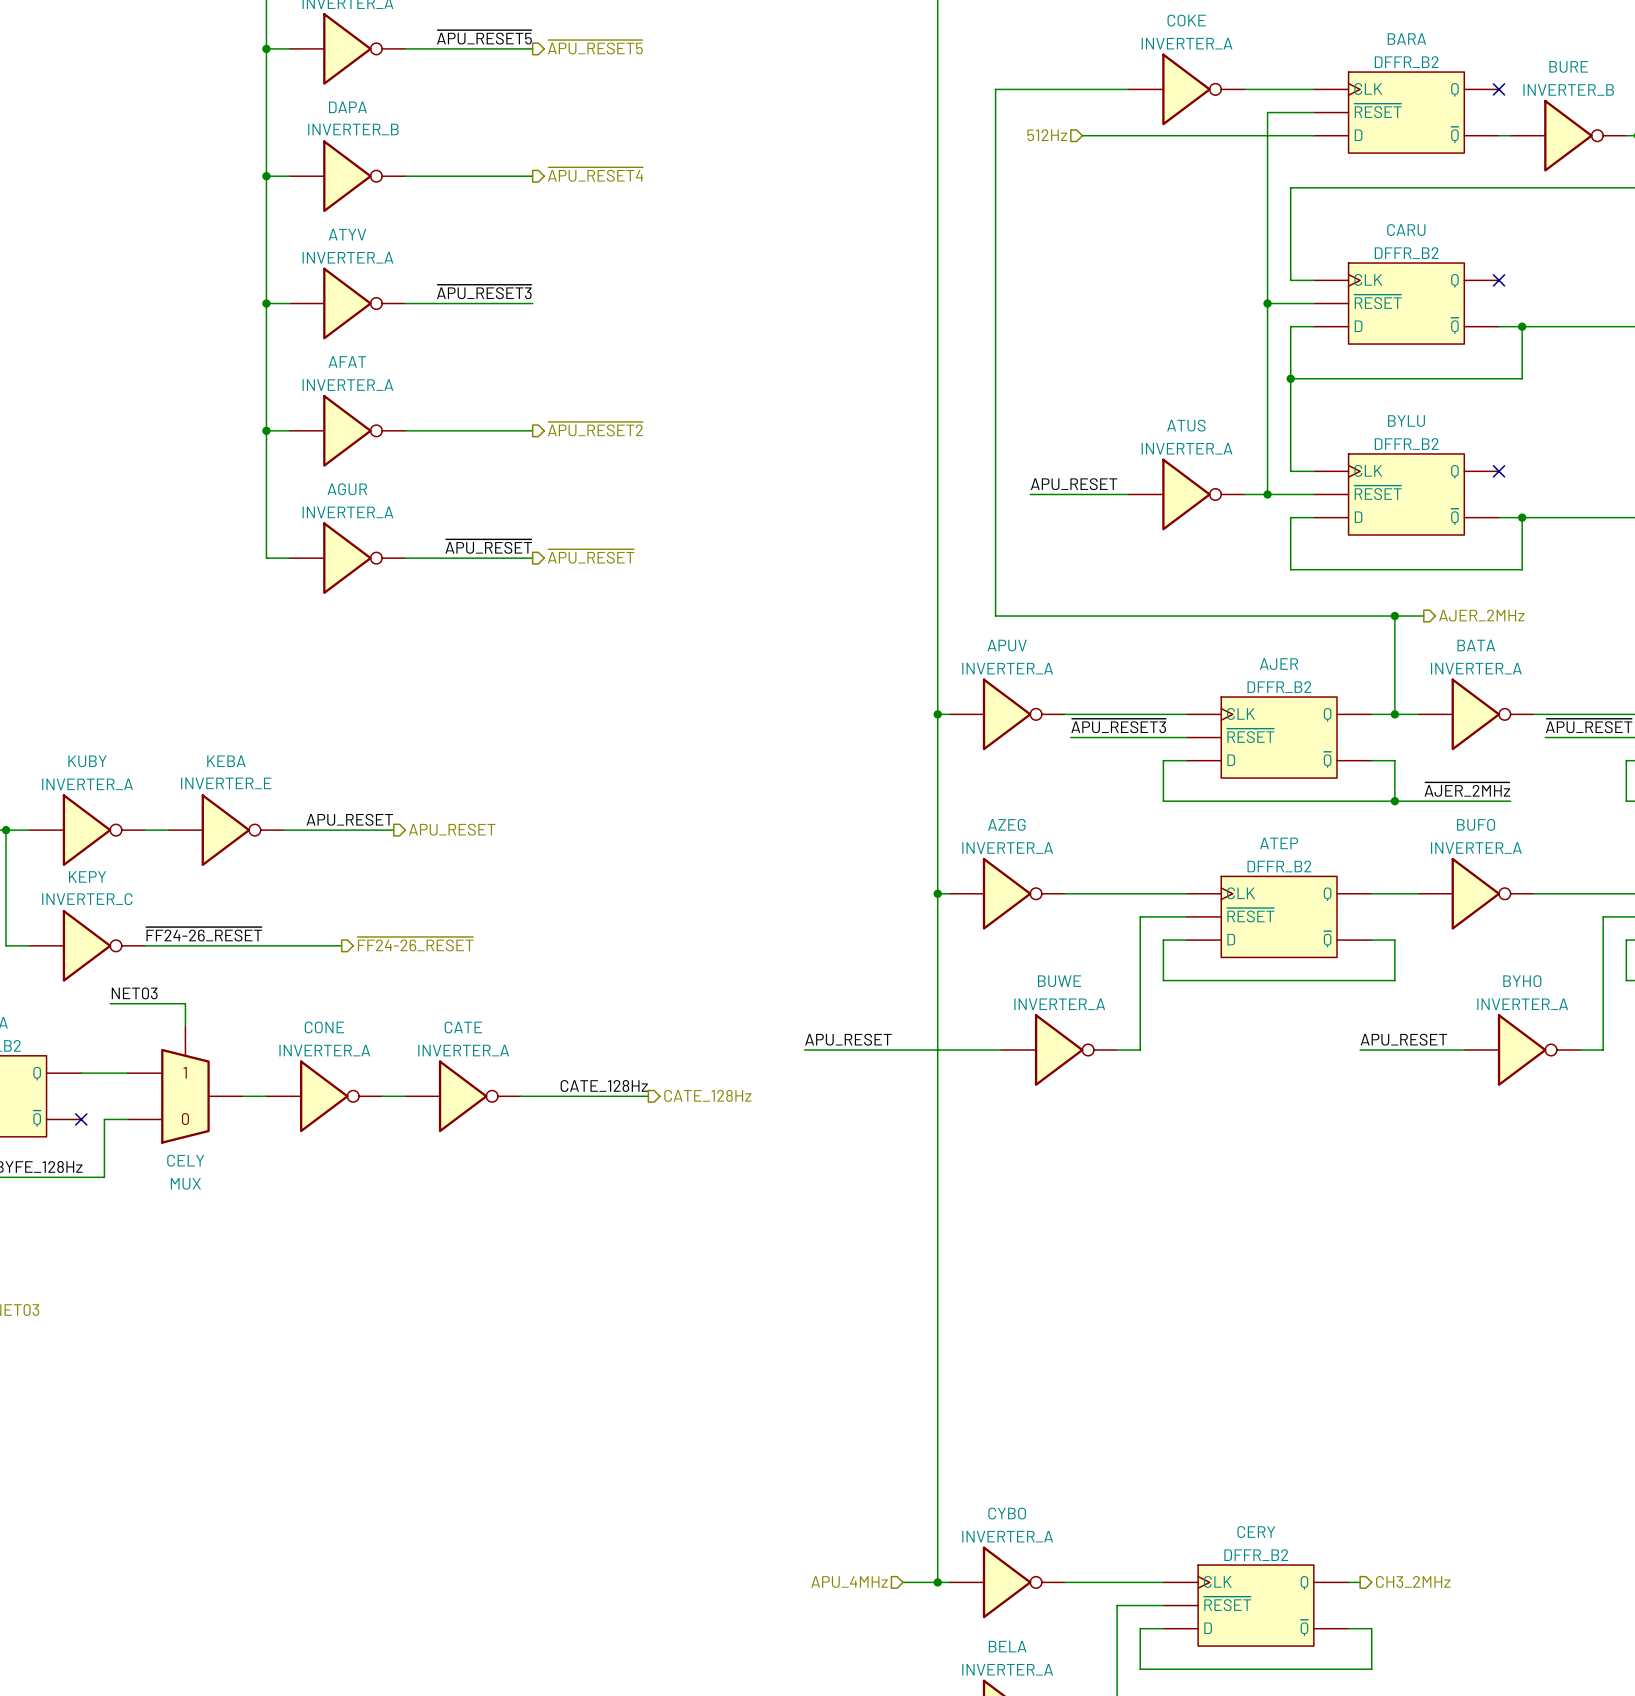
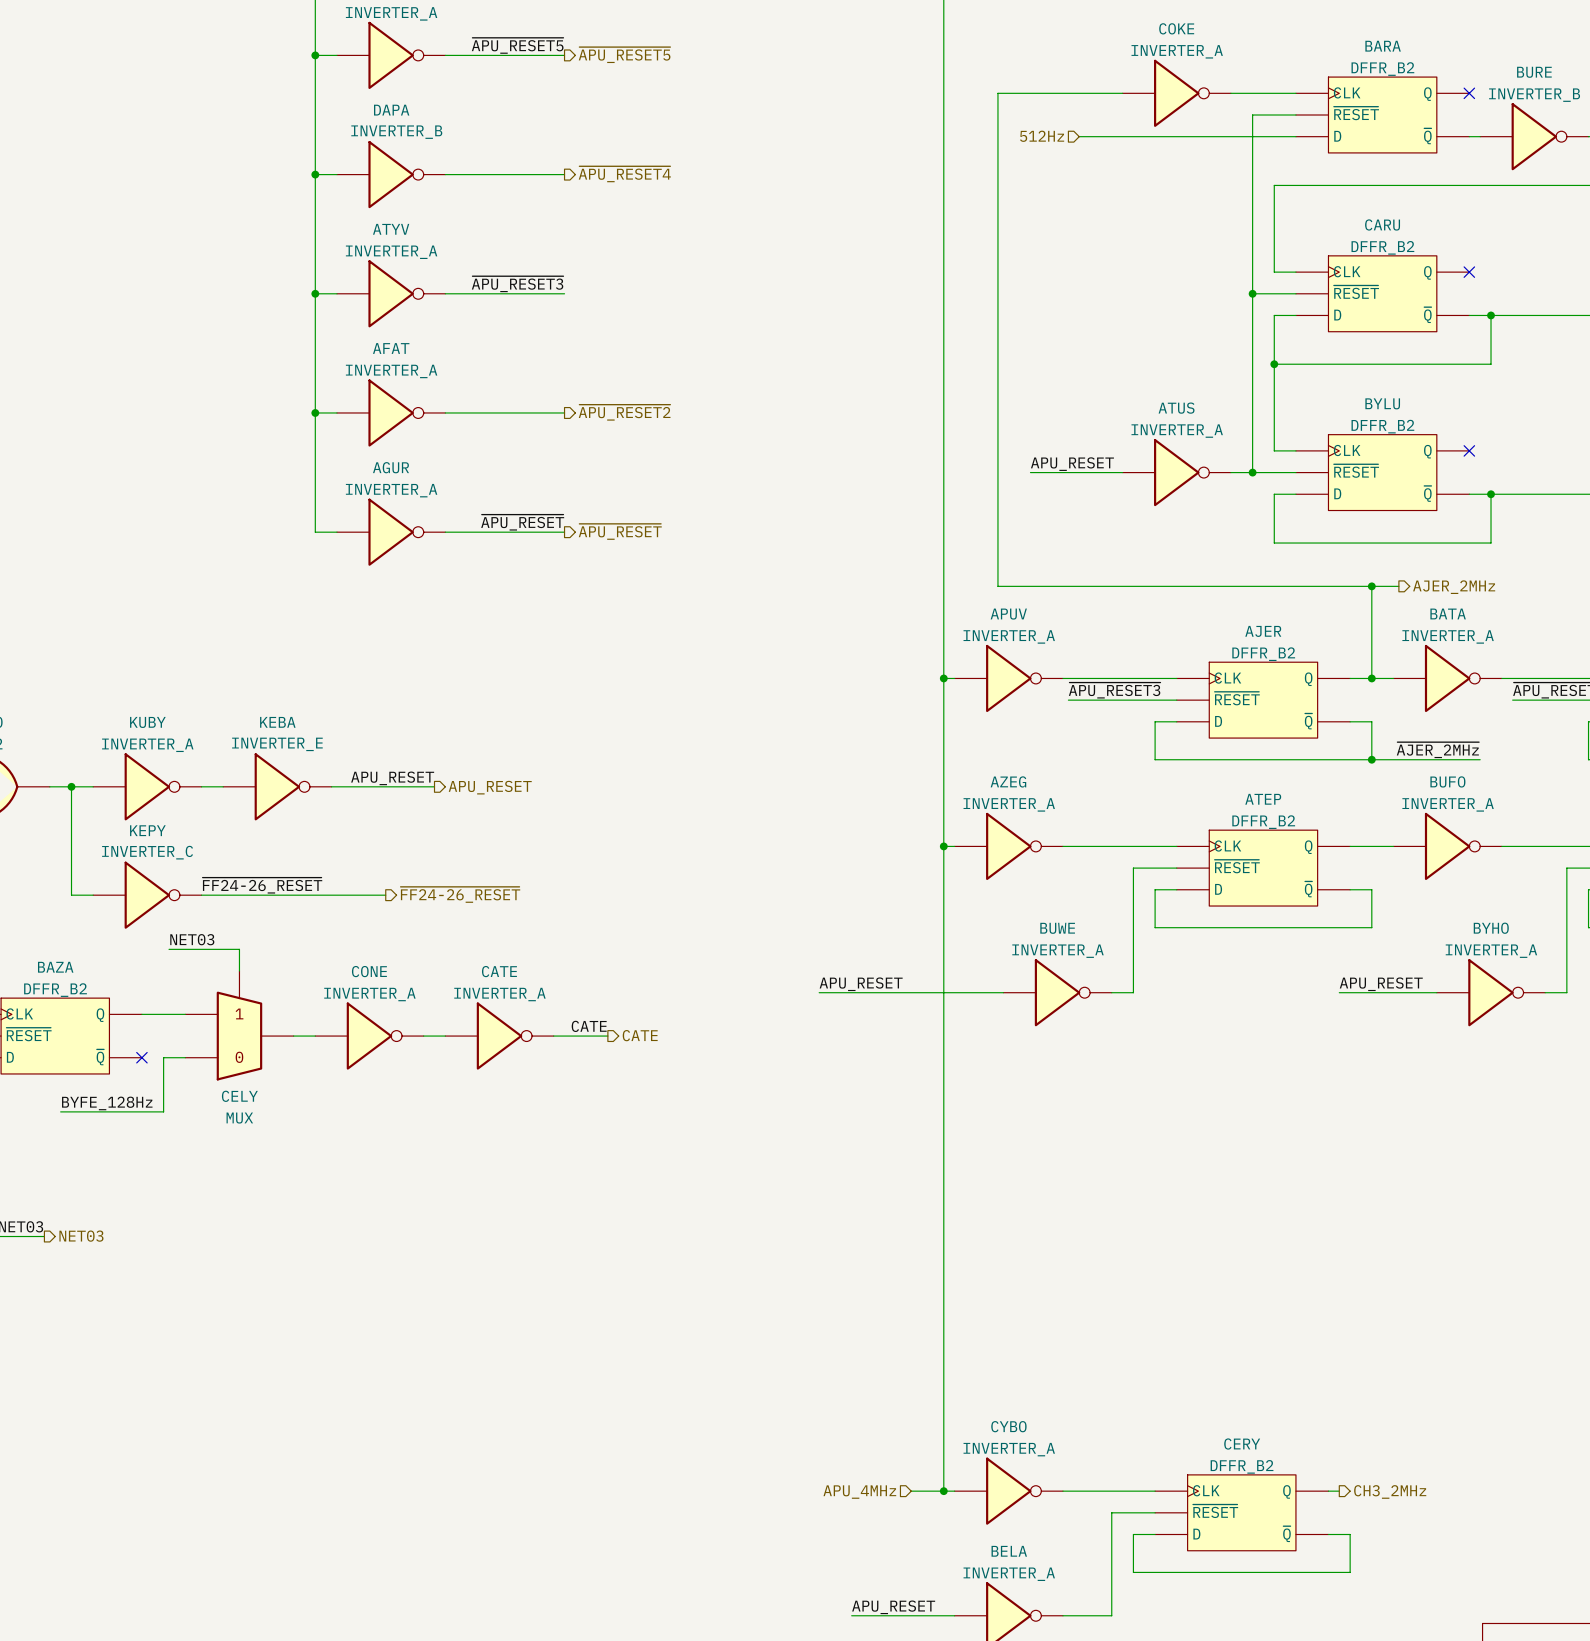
label: none -> CATE (589, 1026)
label: CATE_128Hz (604, 1085) -> none
hierarchical label: none -> CATE (640, 1035)
hierarchical label: CATE_128Hz (707, 1095) -> none
wire: (578, 1096) (648, 1096) -> none

